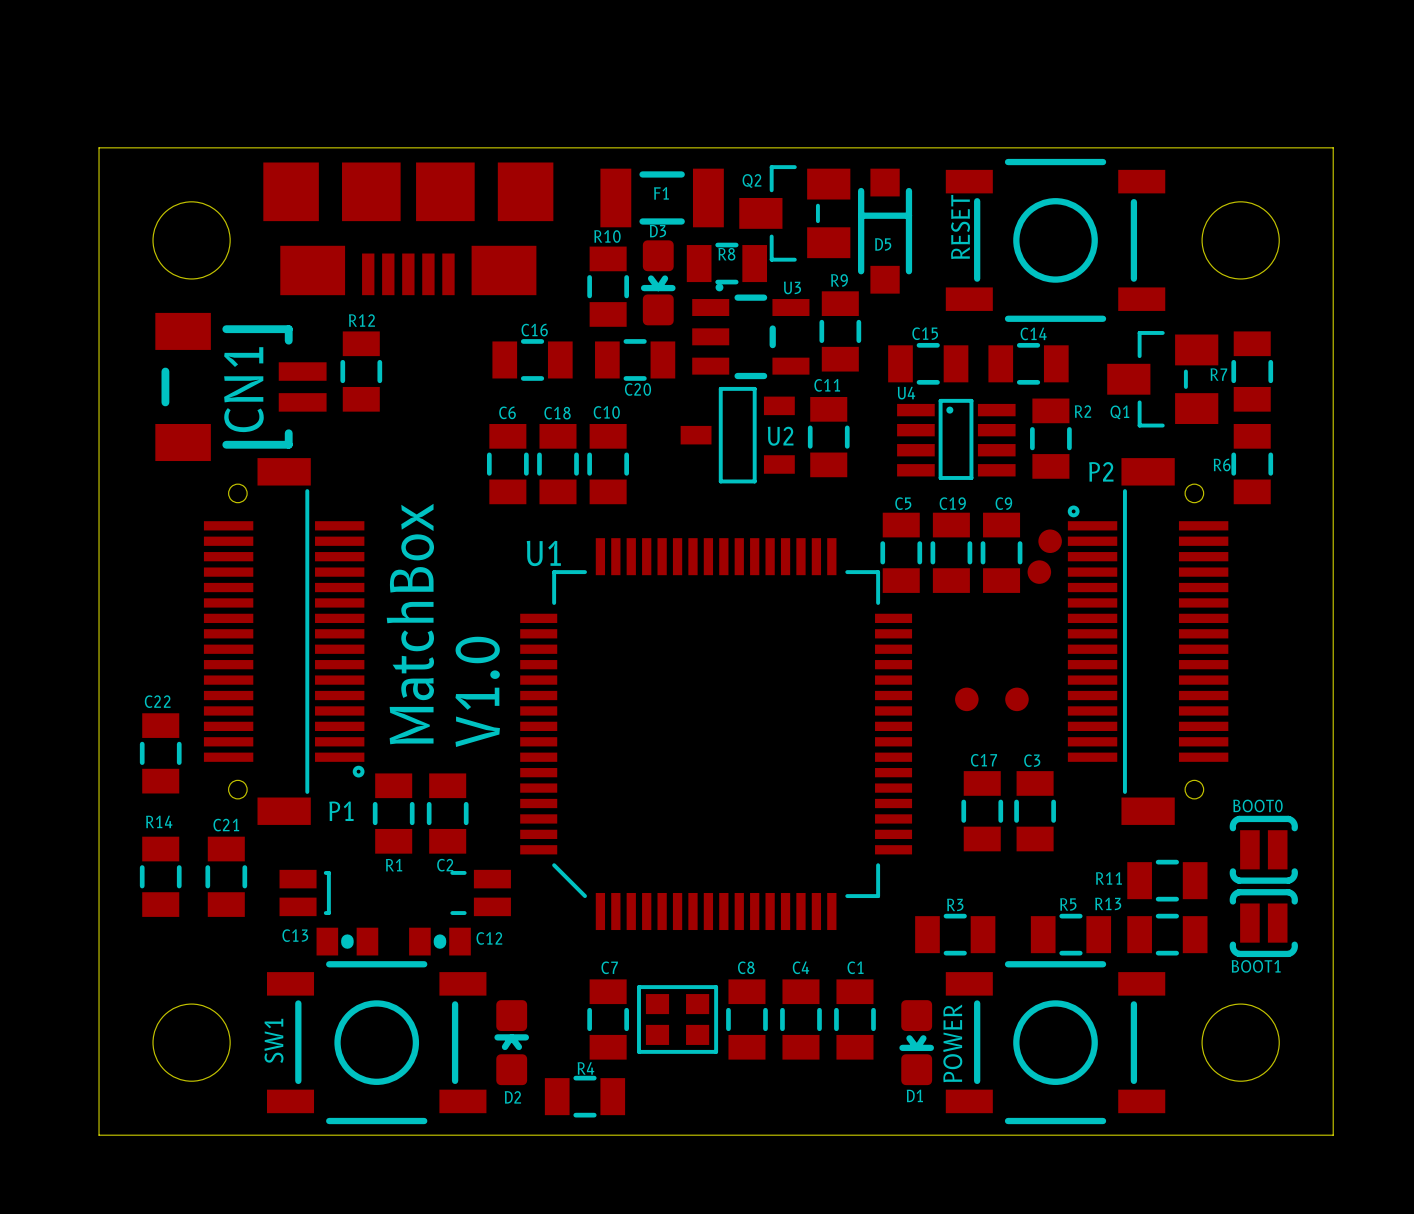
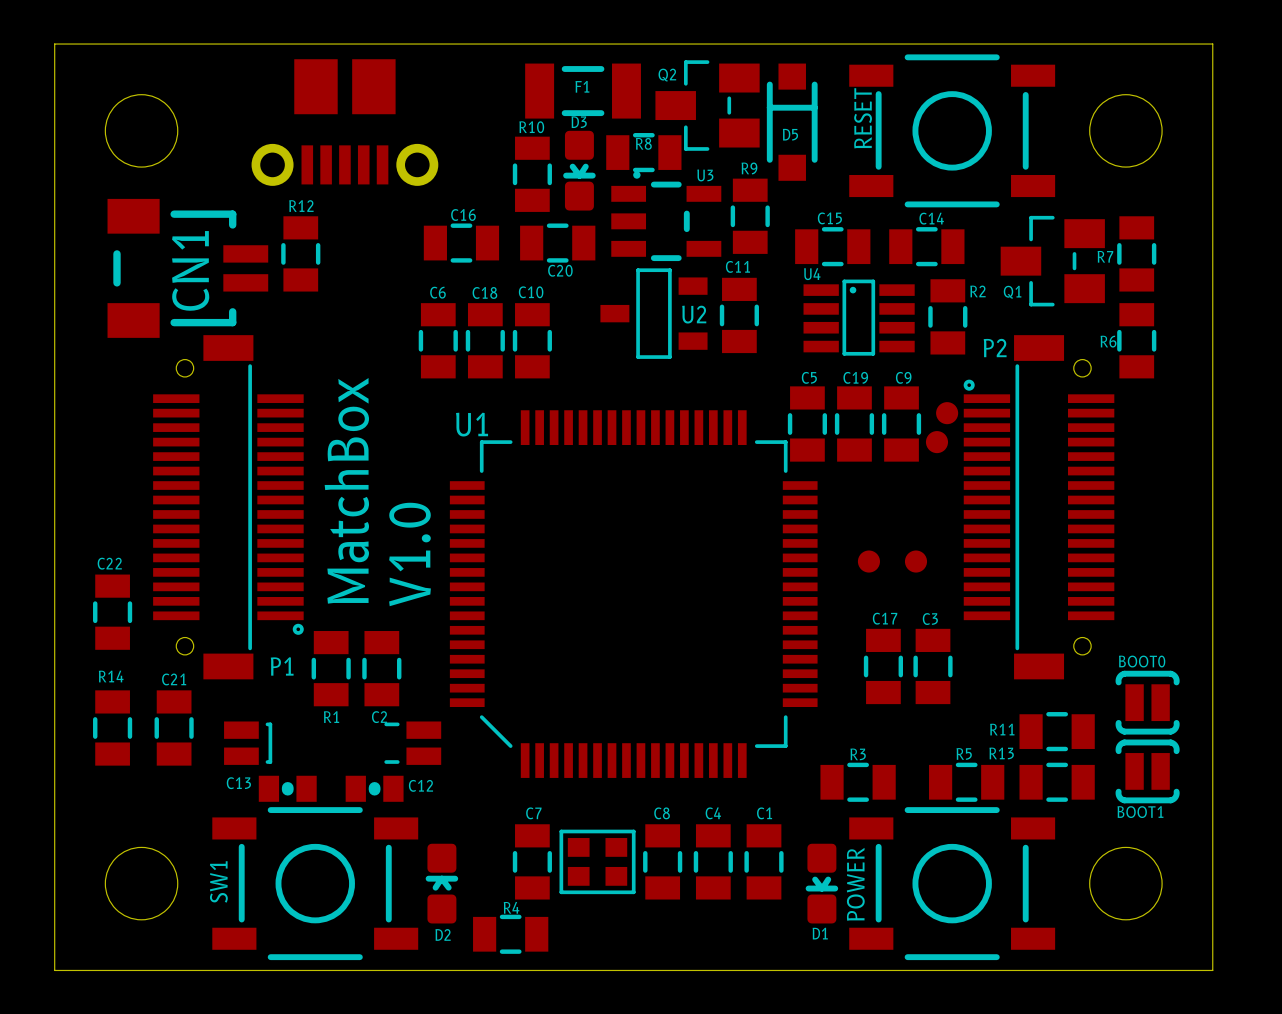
part footprint: [263, 162, 554, 296] -> [251, 59, 439, 186]

